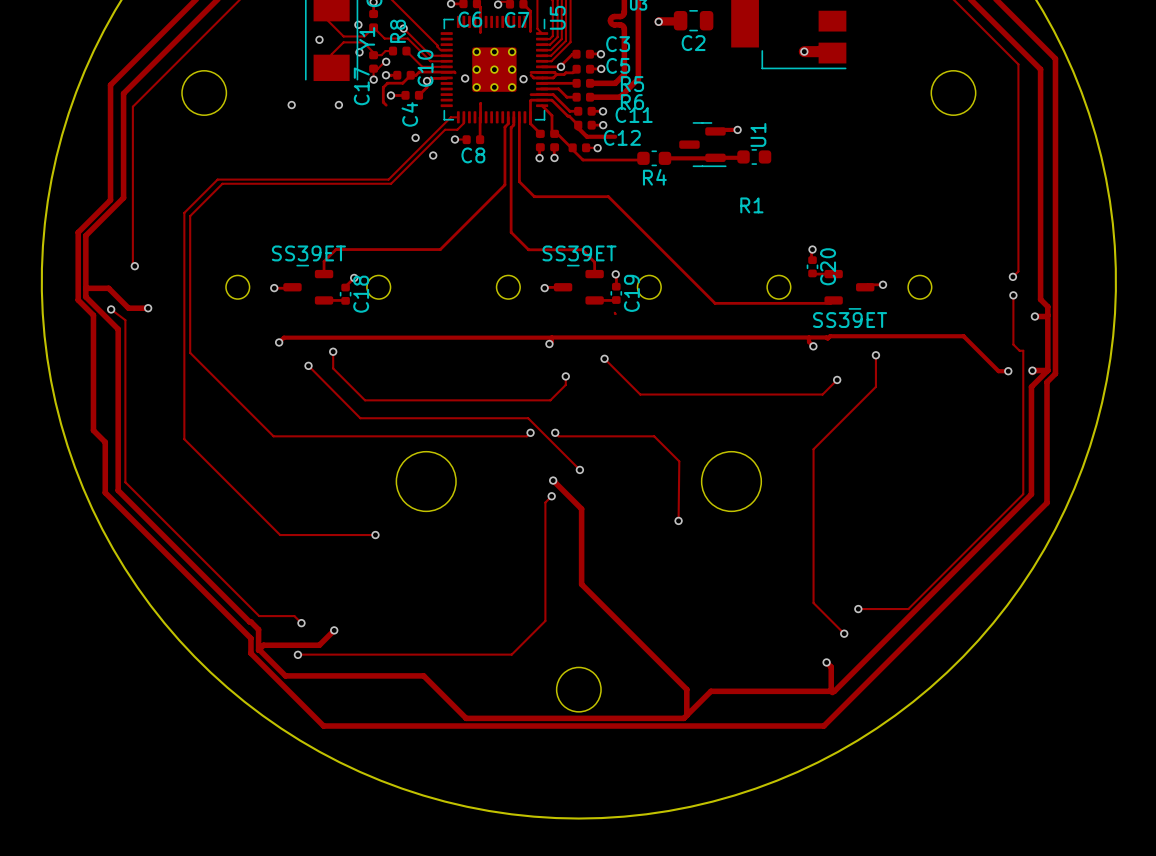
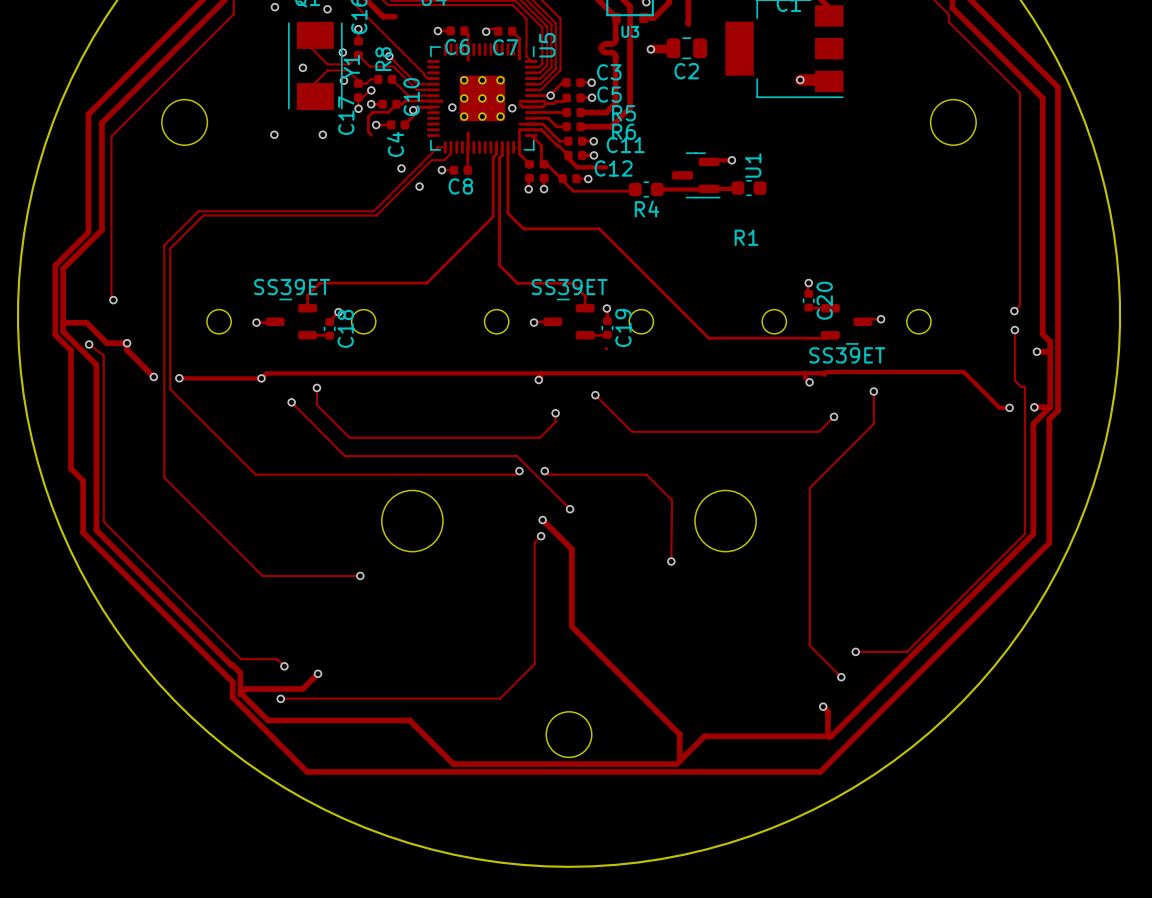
track: none -> (127, 343) (127, 350) (153, 376)
via: none -> (153, 376)
via: none -> (179, 378)
track: none -> (180, 378) (261, 378)

